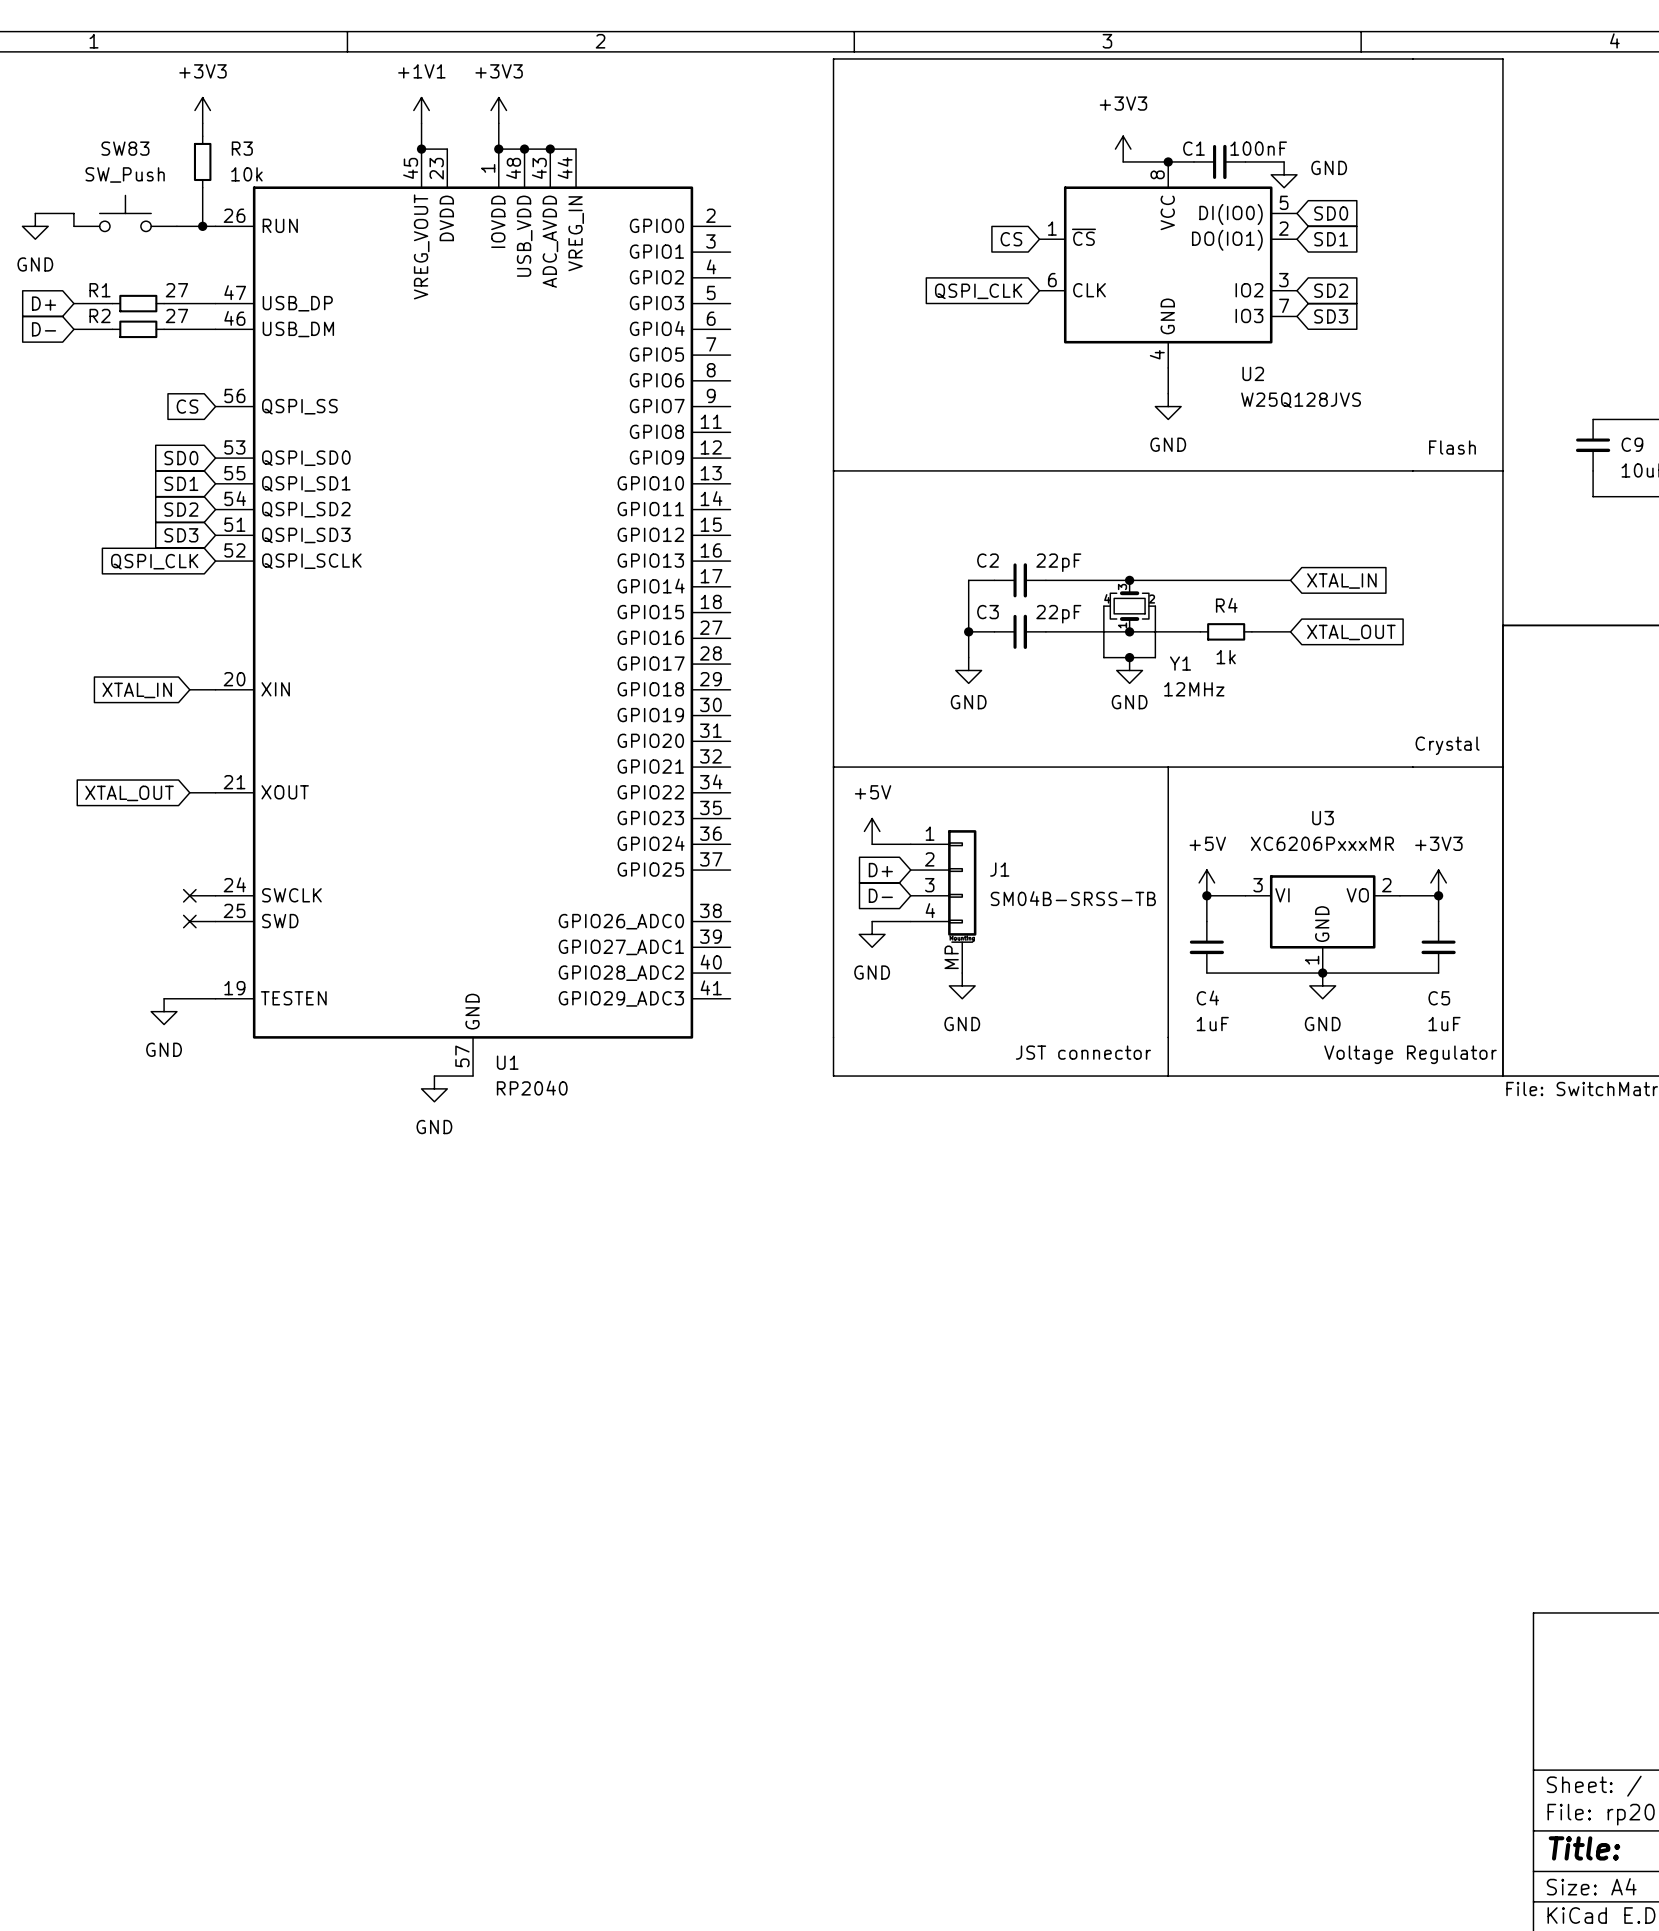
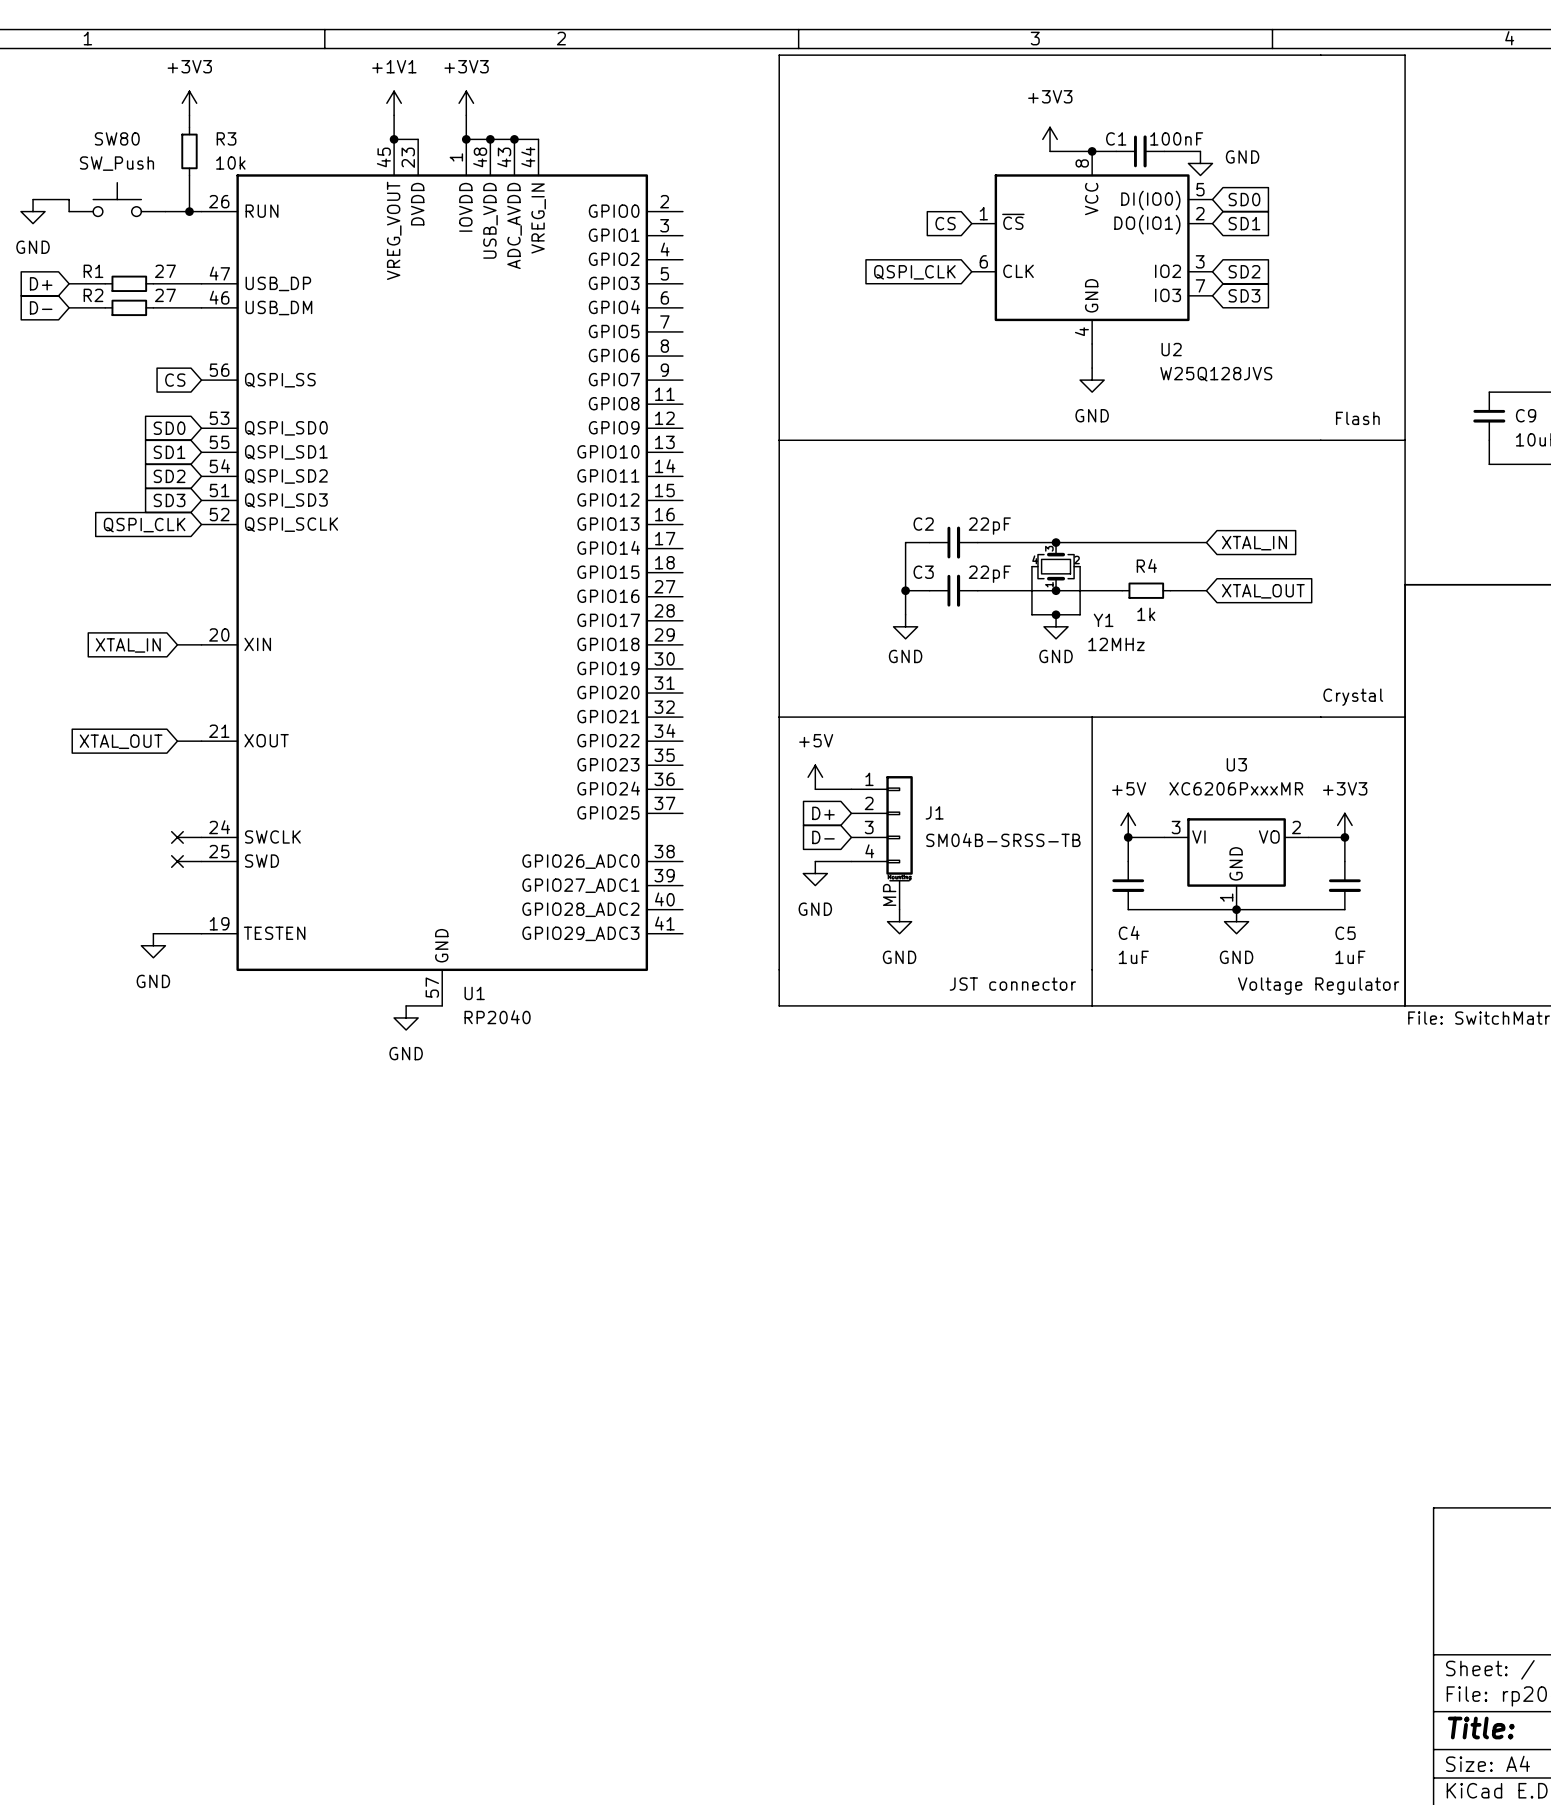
SW83 name: SW83 (125, 148) -> SW80 (117, 138)

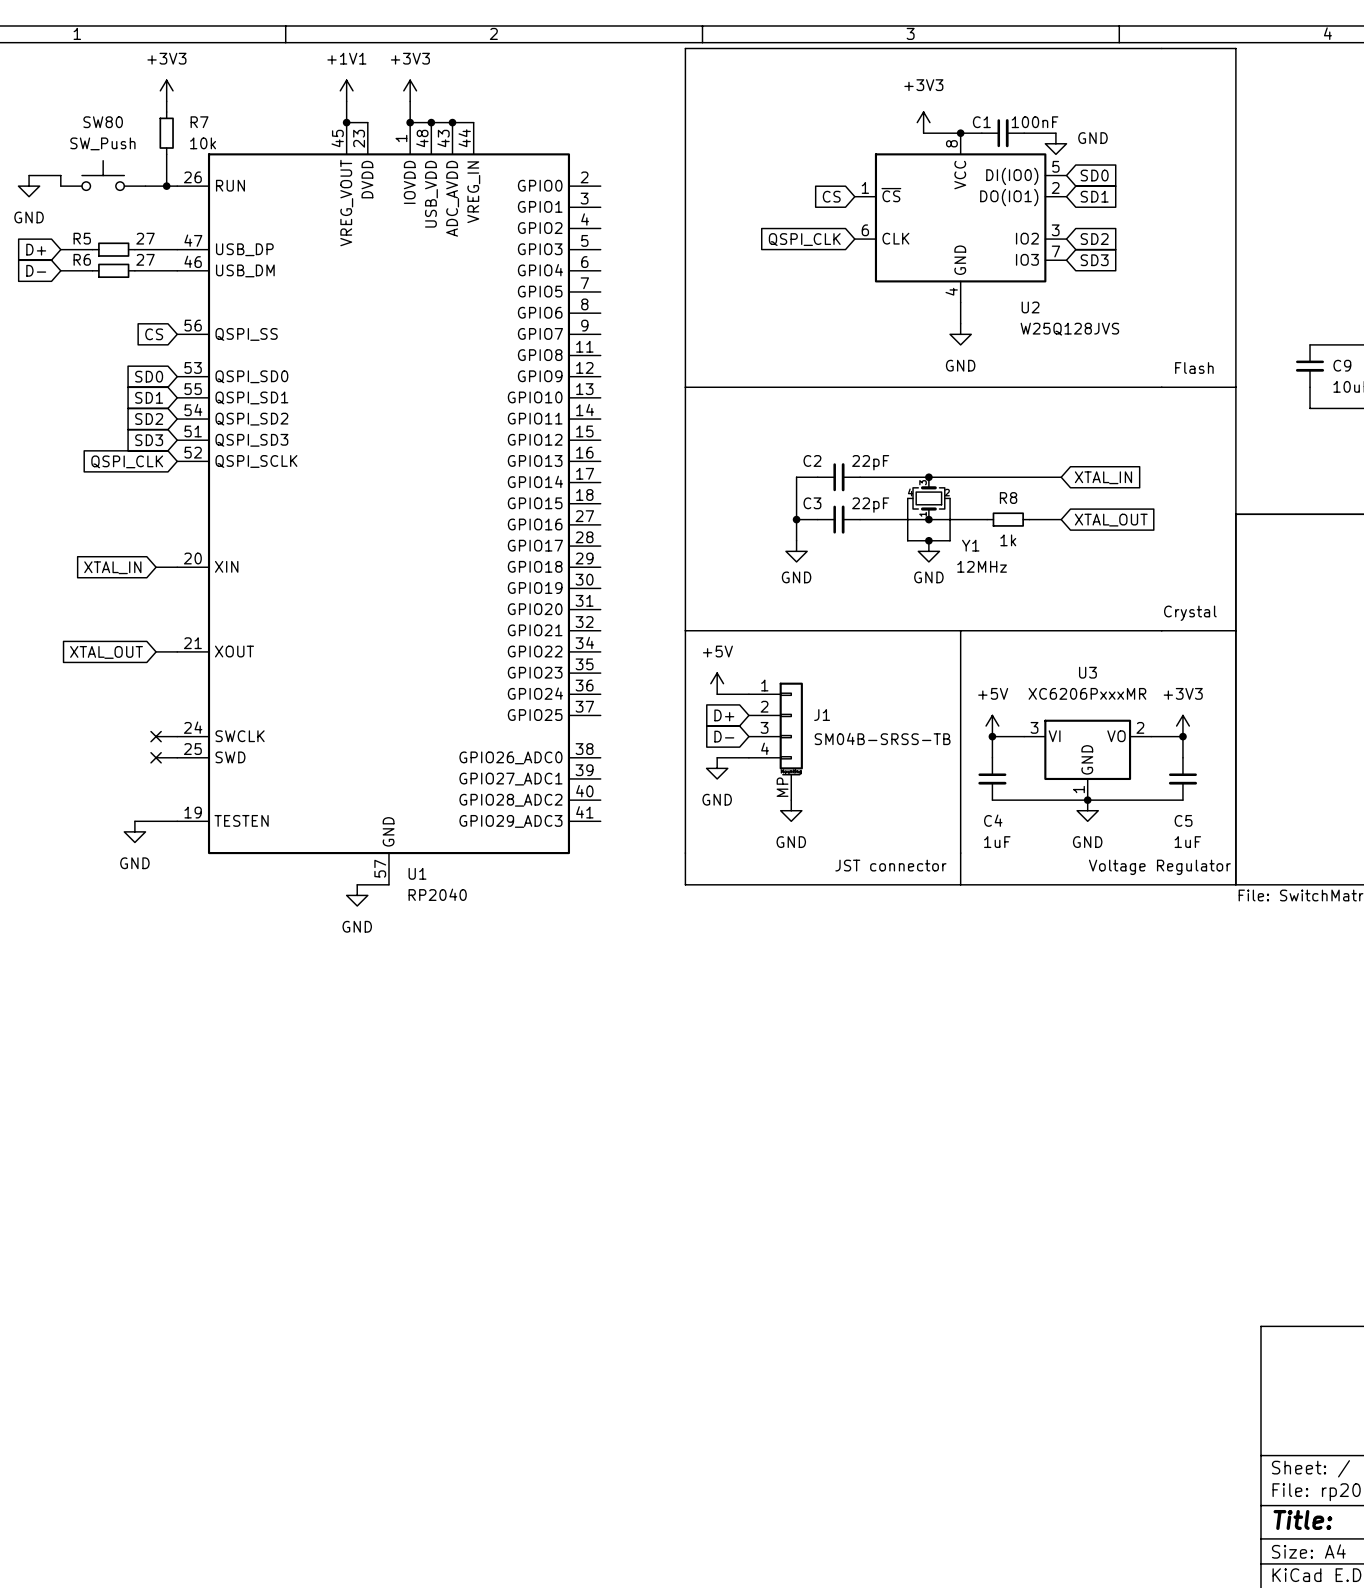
R3 name: R3 (226, 138) -> R7 (199, 122)
R1 name: R1 (93, 271) -> R5 (82, 238)
R2 name: R2 (93, 295) -> R6 (82, 259)
R4 name: R4 (1146, 565) -> R8 (1008, 498)

